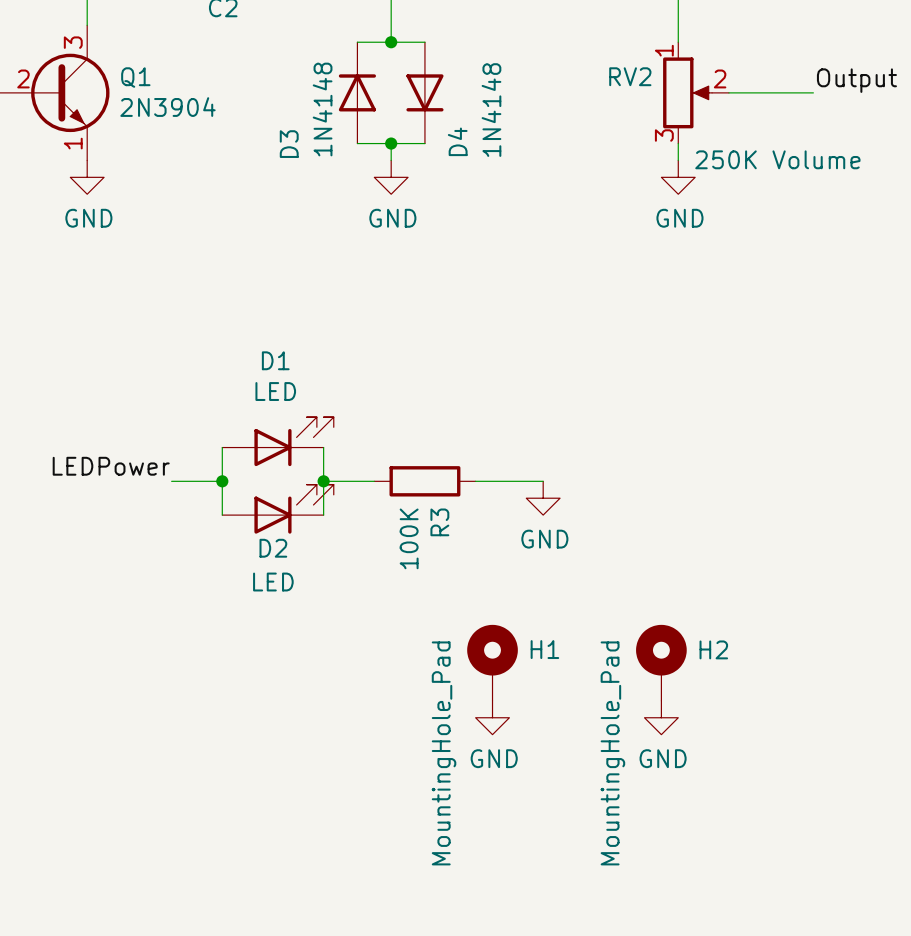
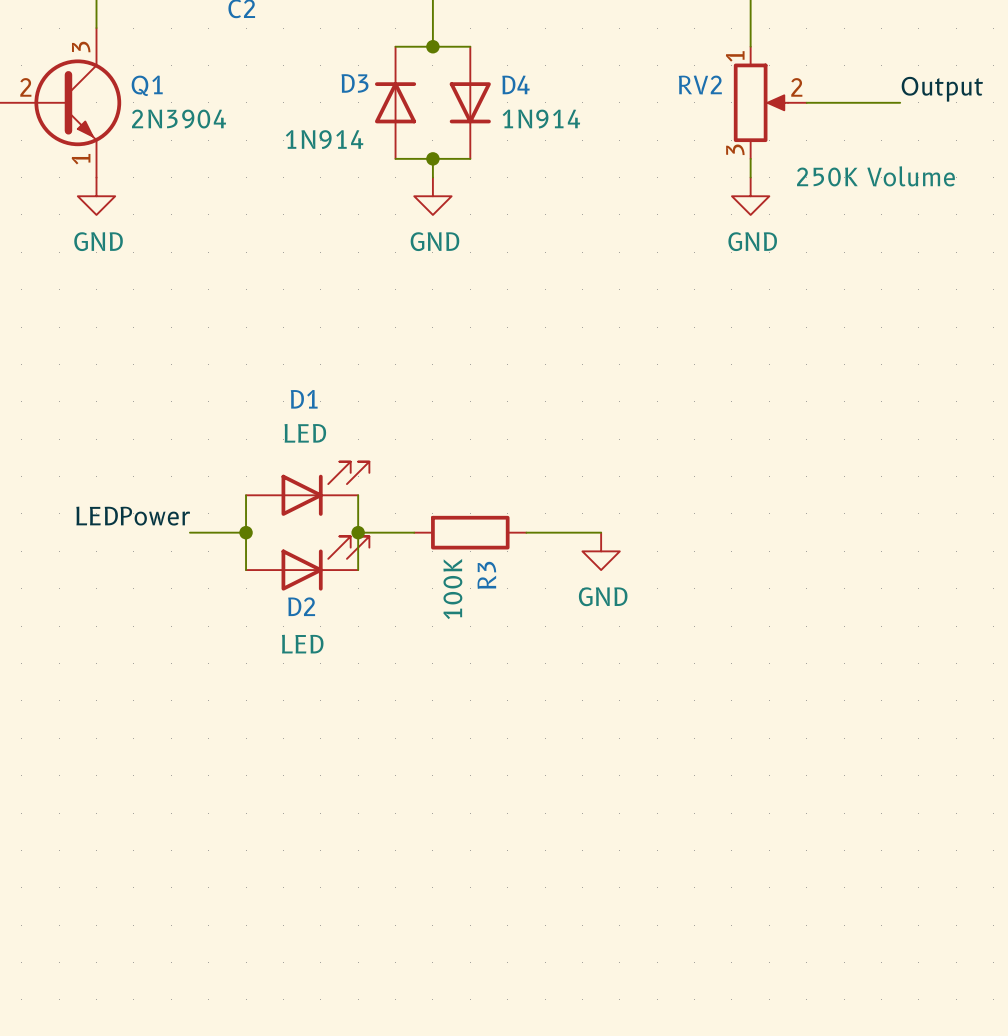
D3 value: 1N4148 (322, 109) -> 1N914 (324, 139)
D4 value: 1N4148 (491, 110) -> 1N914 (541, 119)
D4 name rotation: 0° (457, 141) -> 90° clockwise (516, 84)
D4 name position: D4 (457, 141) -> D4 (516, 84)
D3 name rotation: 0° (289, 144) -> 90° clockwise (355, 83)
D3 name position: D3 (289, 144) -> D3 (355, 83)
H1: MountingHole_Pad (492, 662) -> none
H2: MountingHole_Pad (661, 662) -> none
power symbol: GND (492, 717) -> none
power symbol: GND (661, 717) -> none

